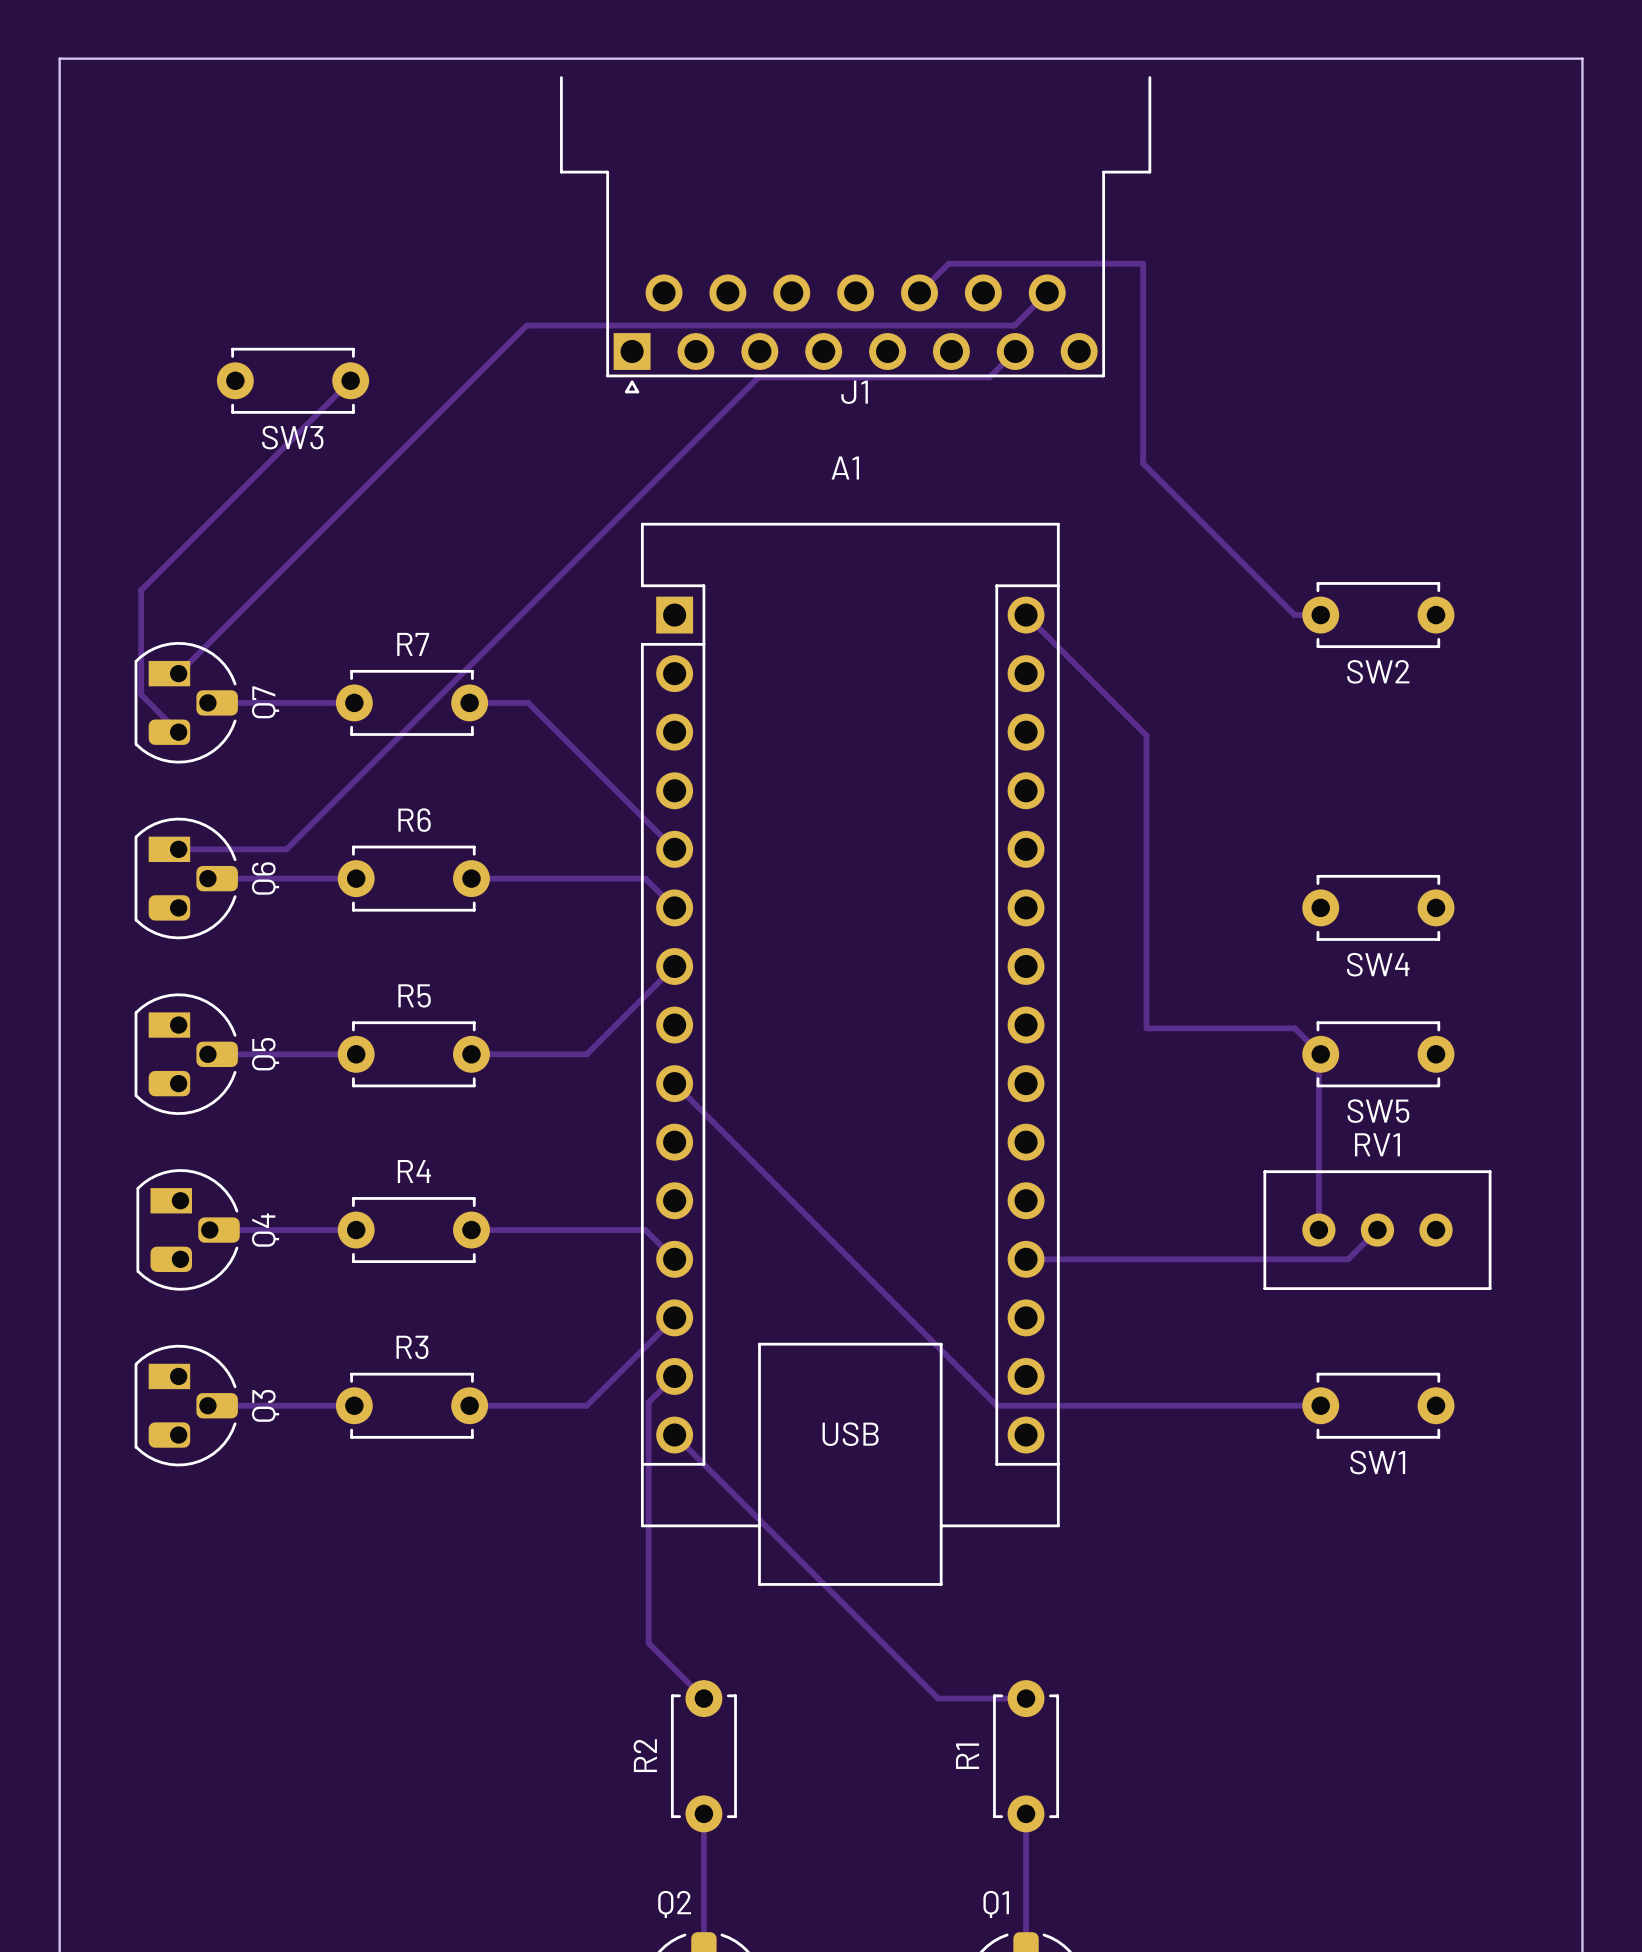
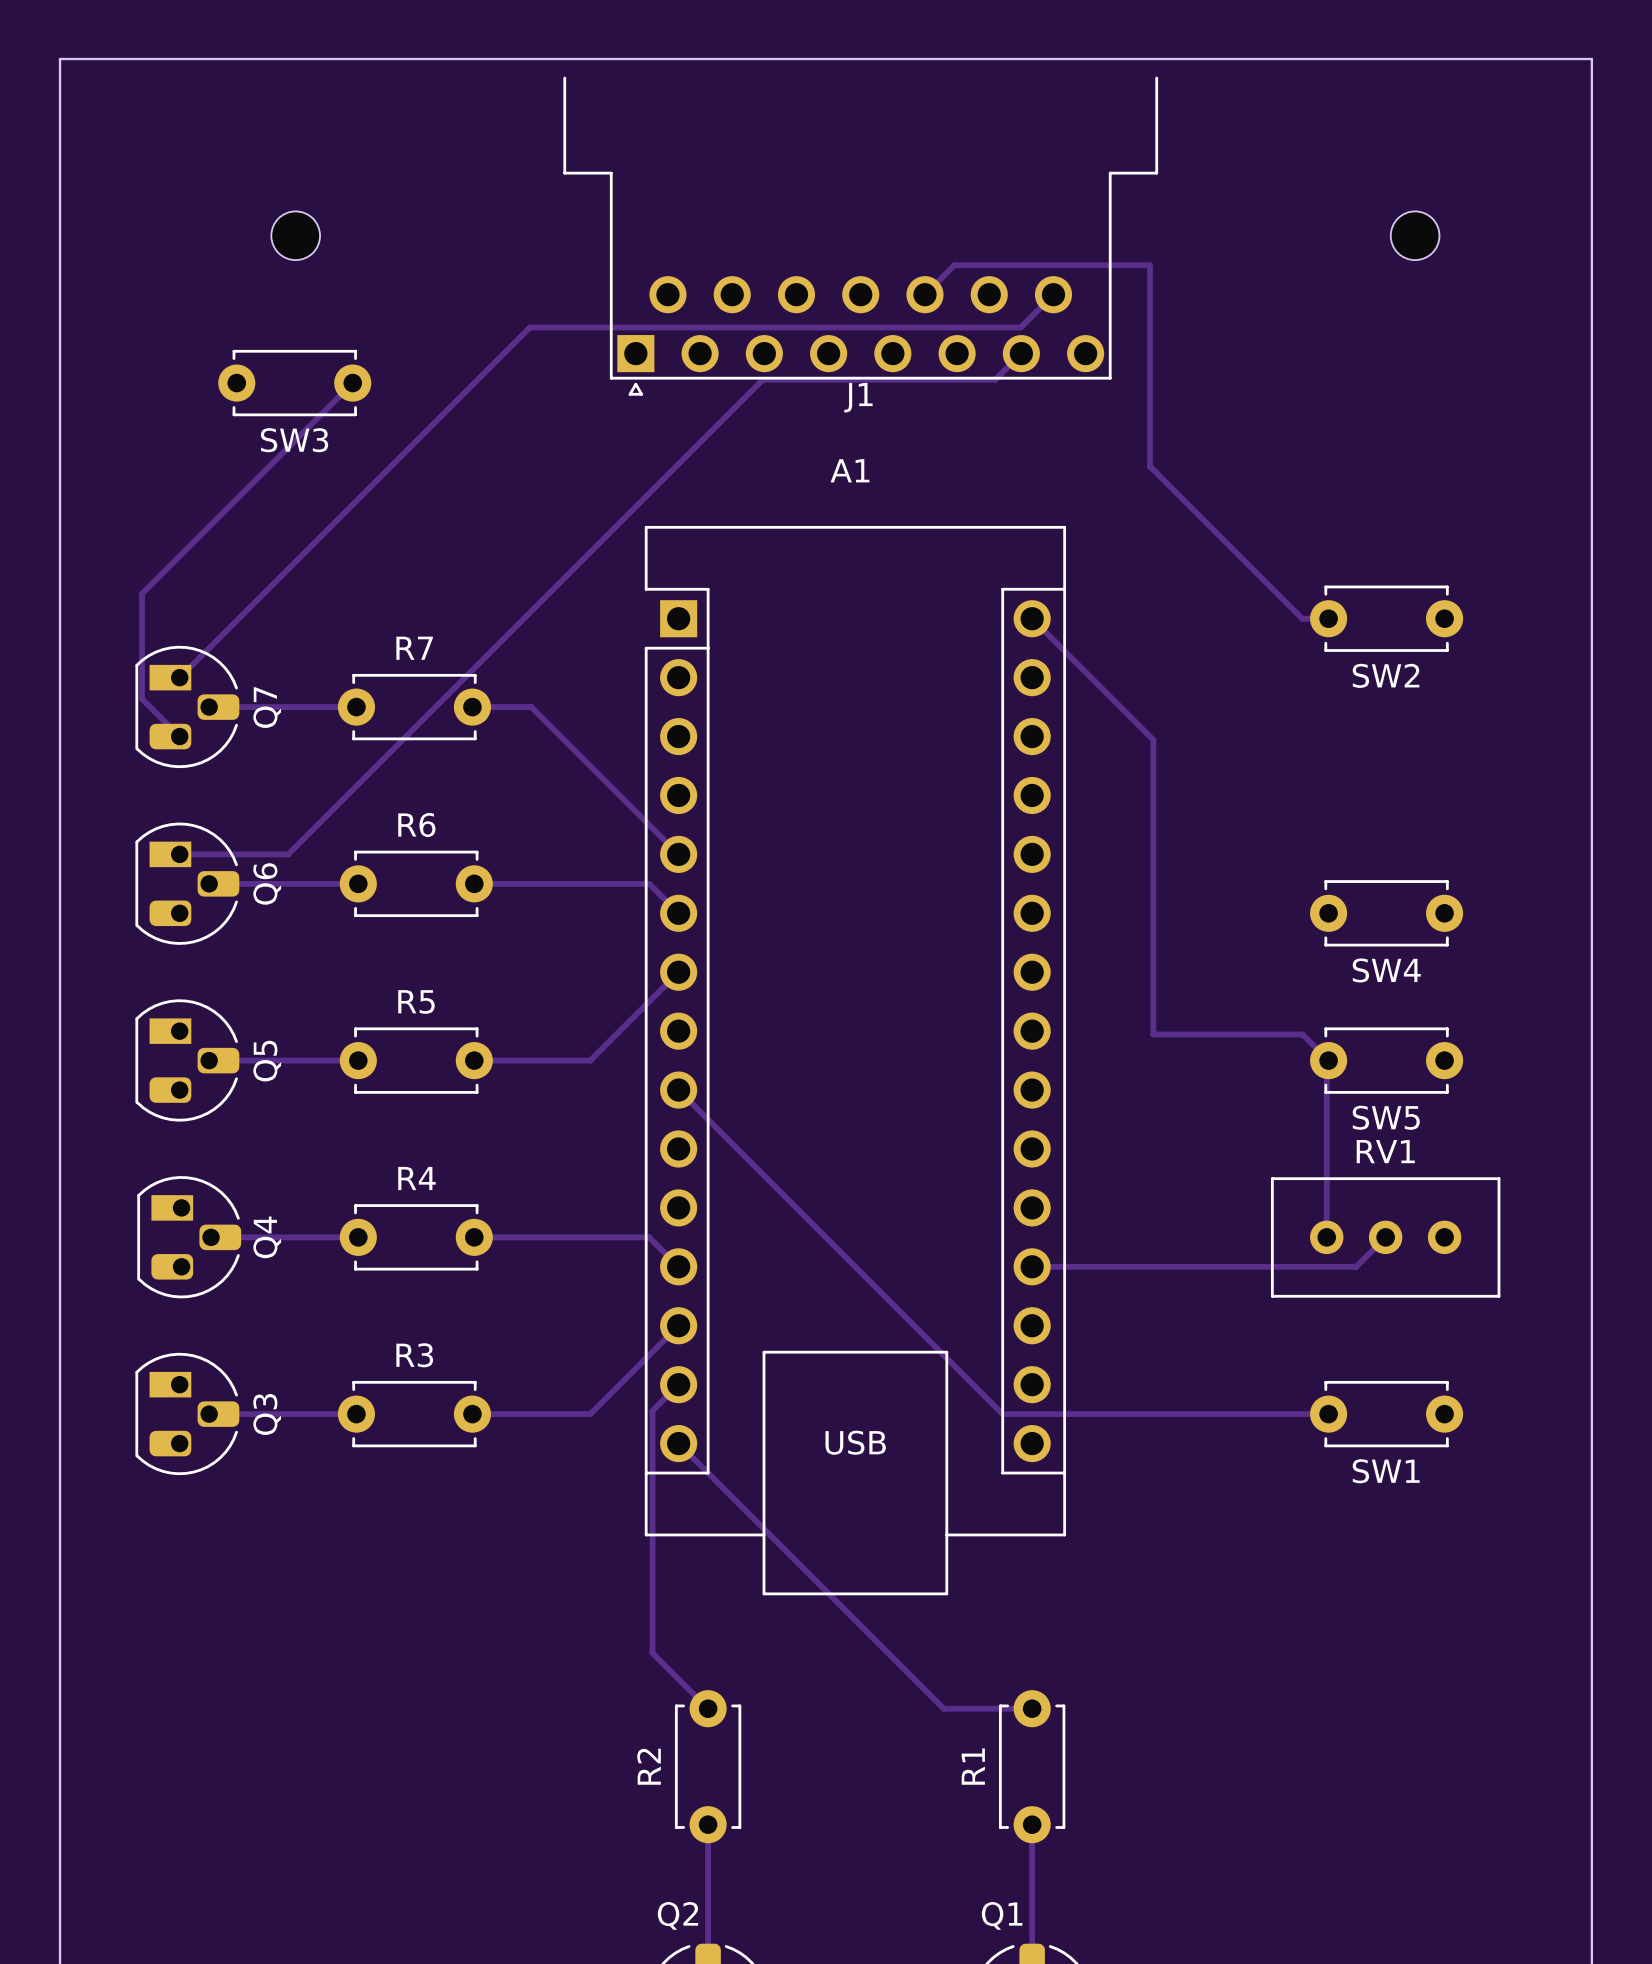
part: none -> (295, 235)
part: none -> (1415, 235)

